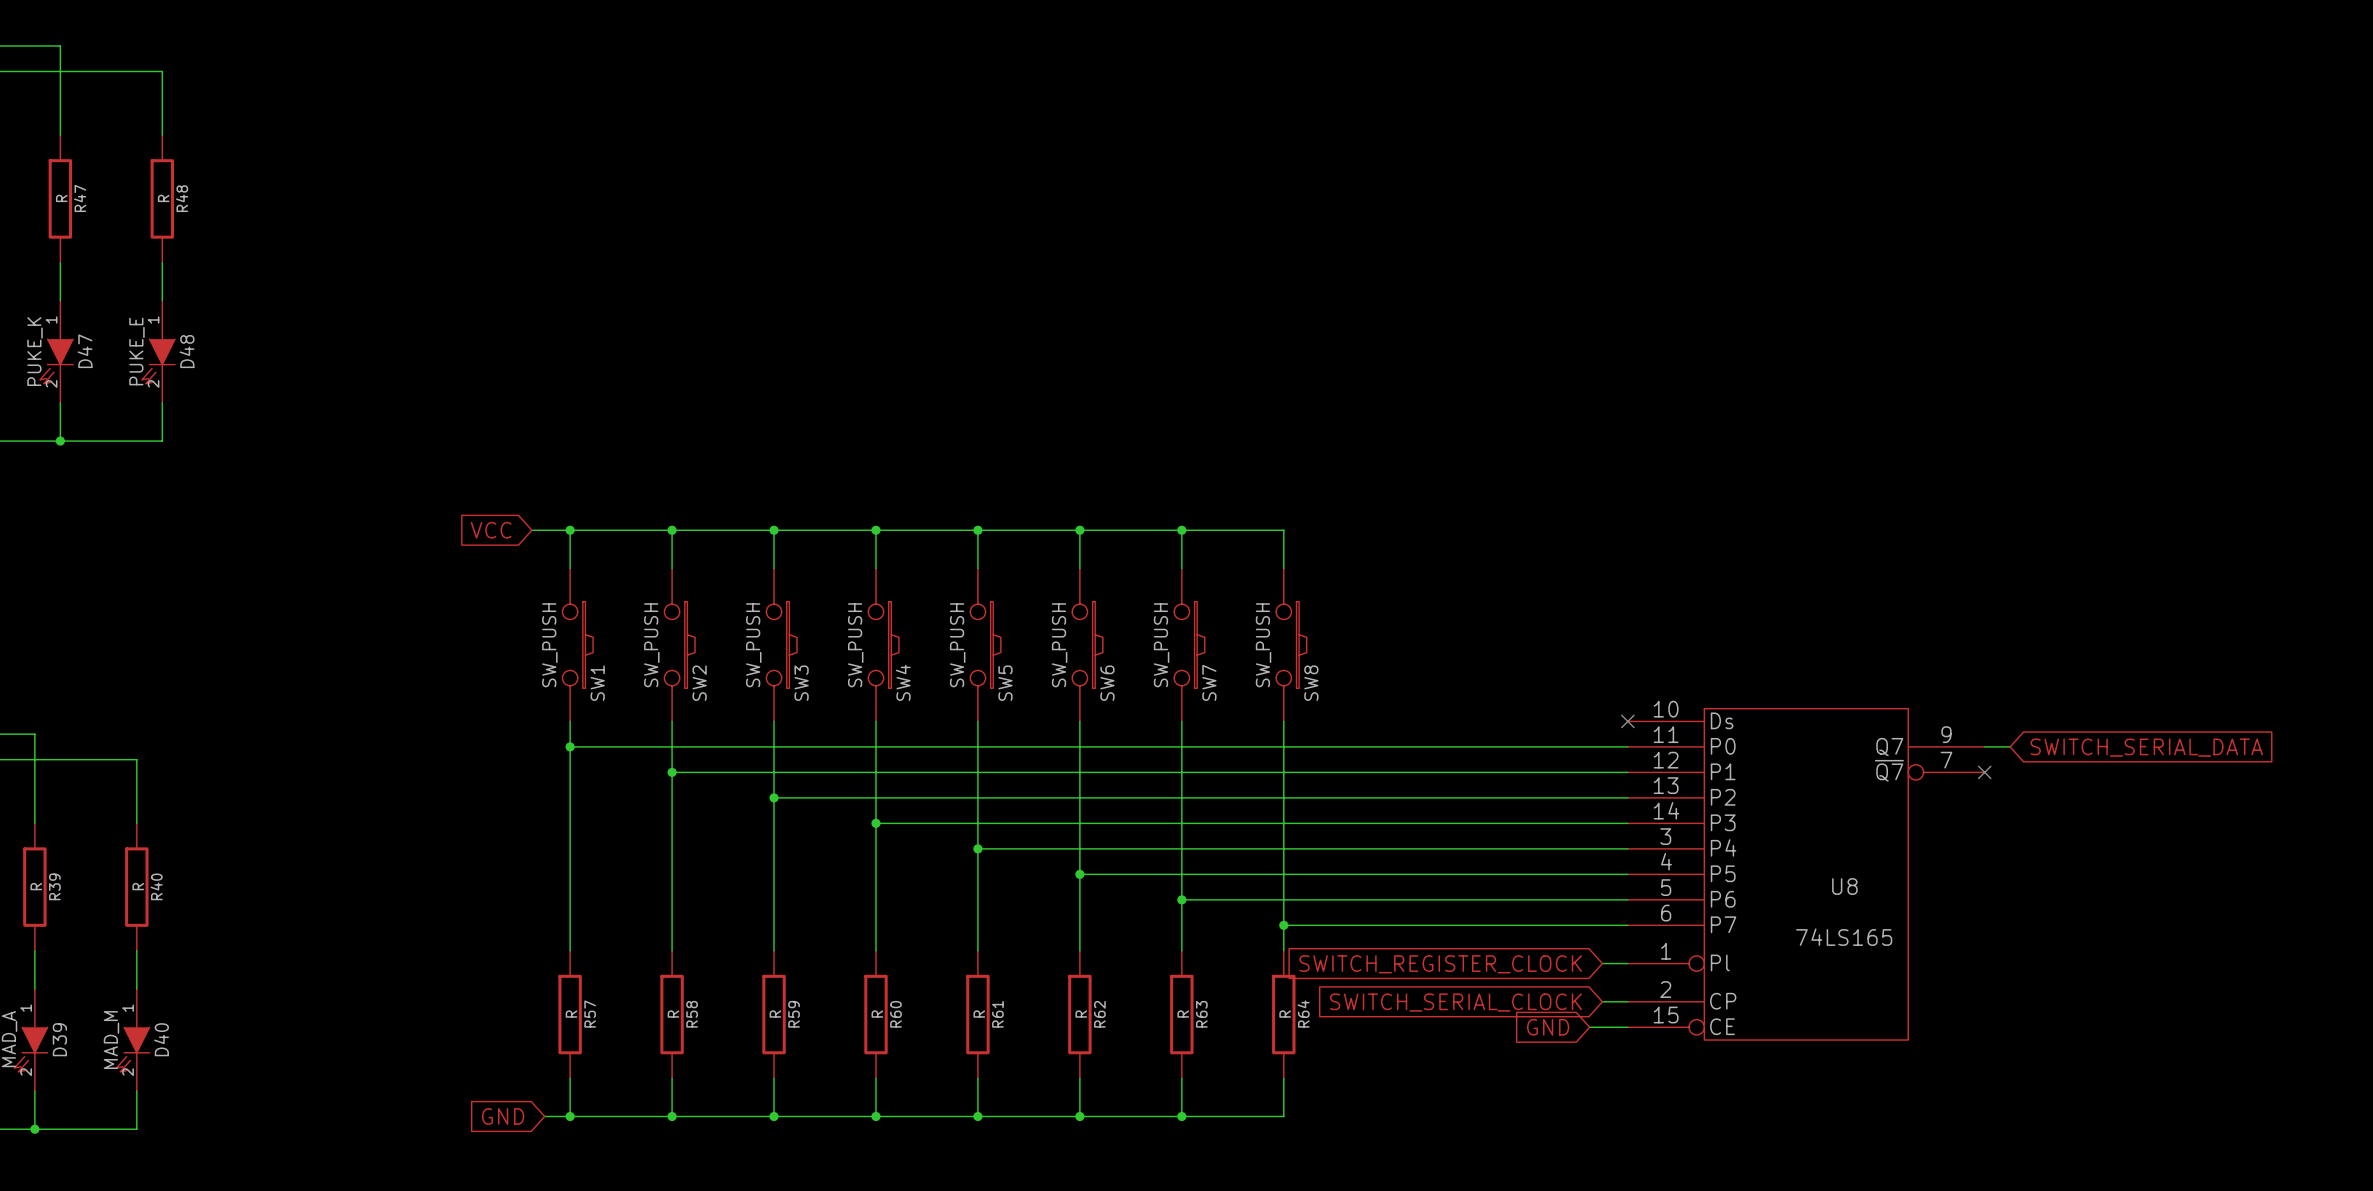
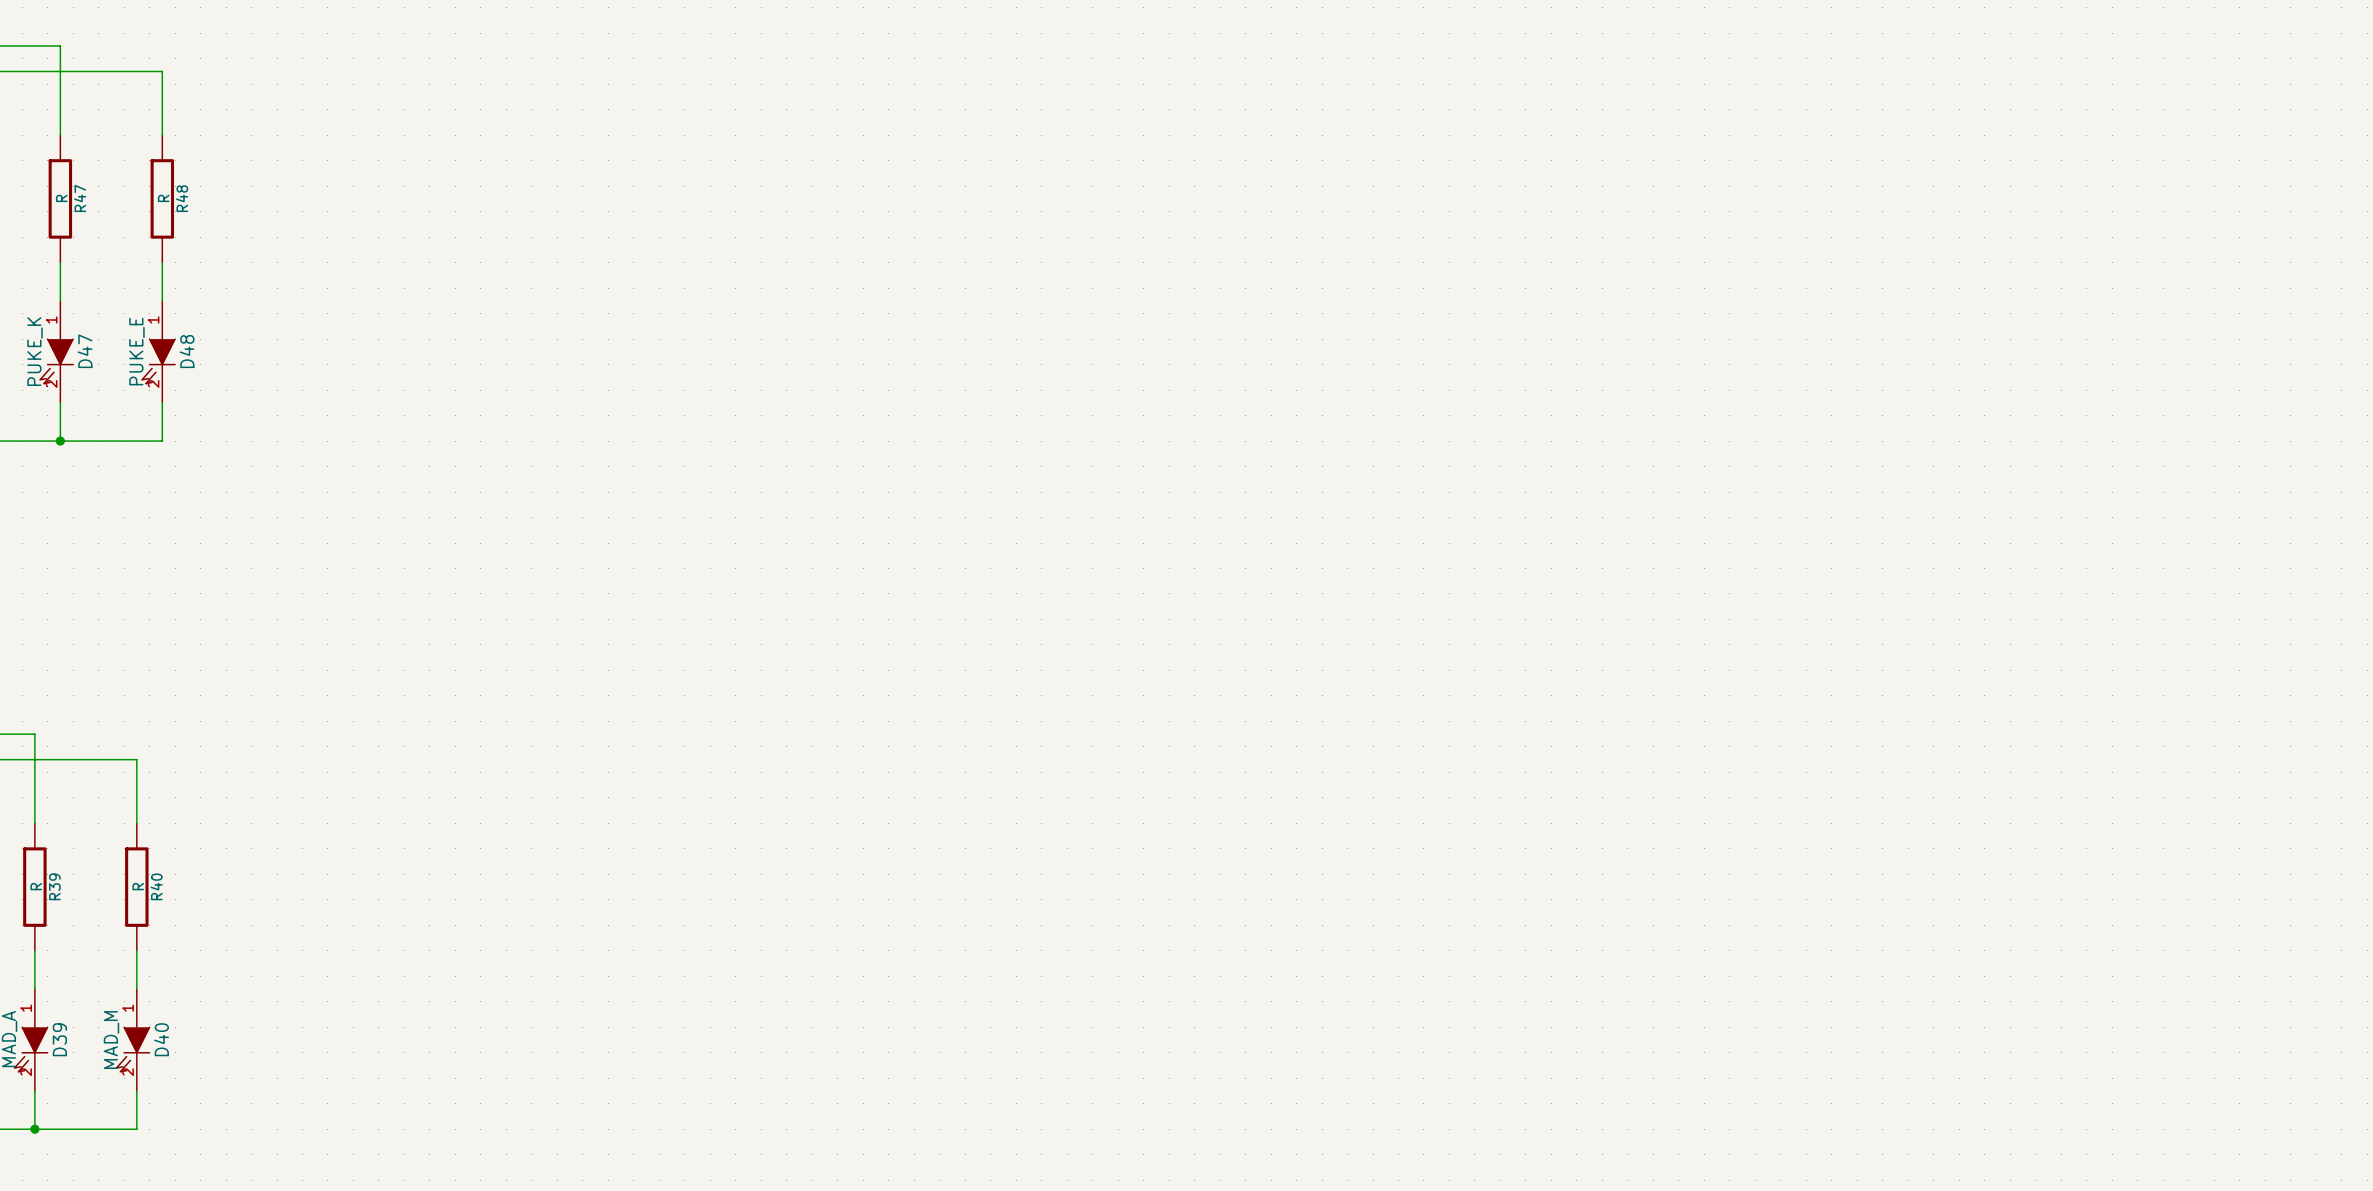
global label: VCC (491, 530) -> none
wire: (531, 530) (1283, 530) (1283, 568) -> none
wire: (570, 530) (570, 568) -> none
junction: (570, 530) -> none
wire: (672, 530) (672, 568) -> none
junction: (672, 530) -> none
wire: (774, 530) (774, 568) -> none
junction: (774, 530) -> none
wire: (875, 530) (875, 568) -> none
junction: (875, 530) -> none
wire: (977, 530) (977, 568) -> none
junction: (977, 530) -> none
wire: (1079, 530) (1079, 568) -> none
junction: (1079, 530) -> none
wire: (1181, 530) (1181, 568) -> none
junction: (1181, 530) -> none
SW1: SW_PUSH (577, 644) -> none
SW2: SW_PUSH (679, 644) -> none
SW3: SW_PUSH (781, 644) -> none
SW4: SW_PUSH (883, 644) -> none
SW5: SW_PUSH (985, 644) -> none
SW6: SW_PUSH (1087, 644) -> none
SW7: SW_PUSH (1189, 644) -> none
SW8: SW_PUSH (1291, 644) -> none
wire: (570, 721) (570, 950) -> none
wire: (672, 721) (672, 950) -> none
wire: (774, 721) (774, 950) -> none
wire: (875, 721) (875, 950) -> none
wire: (977, 721) (977, 950) -> none
wire: (1079, 721) (1079, 950) -> none
wire: (1181, 721) (1181, 950) -> none
wire: (1283, 721) (1283, 950) -> none
no-connect mark: (1627, 721) -> none
wire: (570, 746) (1627, 746) -> none
junction: (570, 746) -> none
wire: (1984, 746) (2010, 746) -> none
global label: SWITCH_SERIAL_DATA (2146, 747) -> none
wire: (672, 772) (1627, 772) -> none
junction: (672, 772) -> none
no-connect mark: (1984, 772) -> none
wire: (774, 797) (1627, 797) -> none
junction: (774, 797) -> none
wire: (875, 823) (1627, 823) -> none
junction: (875, 823) -> none
wire: (977, 848) (1627, 848) -> none
junction: (977, 848) -> none
wire: (1079, 874) (1627, 874) -> none
junction: (1079, 874) -> none
U8: 74LS165 (1806, 874) -> none
wire: (1181, 899) (1627, 899) -> none
junction: (1181, 899) -> none
wire: (1283, 925) (1627, 925) -> none
junction: (1283, 925) -> none
wire: (1602, 963) (1627, 963) -> none
global label: SWITCH_REGISTER_CLOCK (1440, 964) -> none
wire: (1602, 1001) (1627, 1001) -> none
global label: SWITCH_SERIAL_CLOCK (1456, 1002) -> none
R57: R (570, 1014) -> none
R58: R (672, 1014) -> none
R59: R (774, 1014) -> none
R60: R (875, 1014) -> none
R61: R (977, 1014) -> none
R62: R (1079, 1014) -> none
R63: R (1181, 1014) -> none
R64: R (1283, 1014) -> none
global label: GND (1548, 1027) -> none
wire: (1589, 1027) (1627, 1027) -> none
wire: (570, 1078) (570, 1116) -> none
wire: (672, 1078) (672, 1116) -> none
wire: (774, 1078) (774, 1116) -> none
wire: (875, 1078) (875, 1116) -> none
wire: (977, 1078) (977, 1116) -> none
wire: (1079, 1078) (1079, 1116) -> none
wire: (1181, 1078) (1181, 1116) -> none
wire: (1283, 1078) (1283, 1116) (544, 1116) -> none
global label: GND (503, 1116) -> none
junction: (570, 1116) -> none
junction: (672, 1116) -> none
junction: (774, 1116) -> none
junction: (875, 1116) -> none
junction: (977, 1116) -> none
junction: (1079, 1116) -> none
junction: (1181, 1116) -> none

